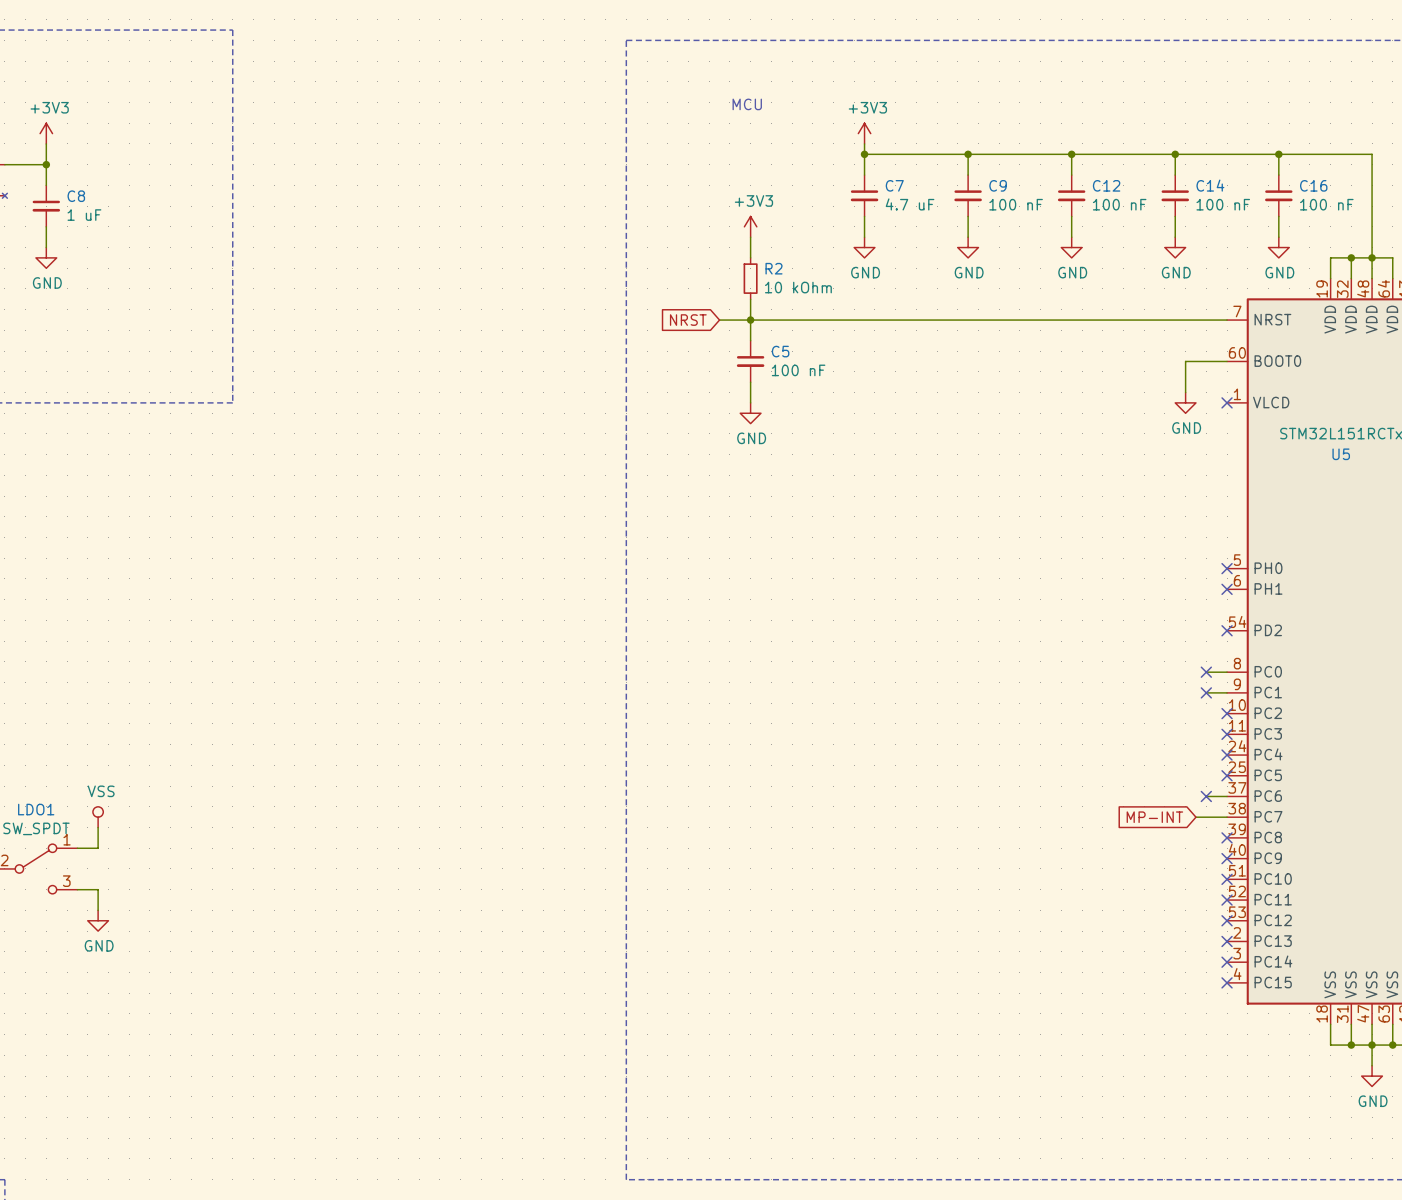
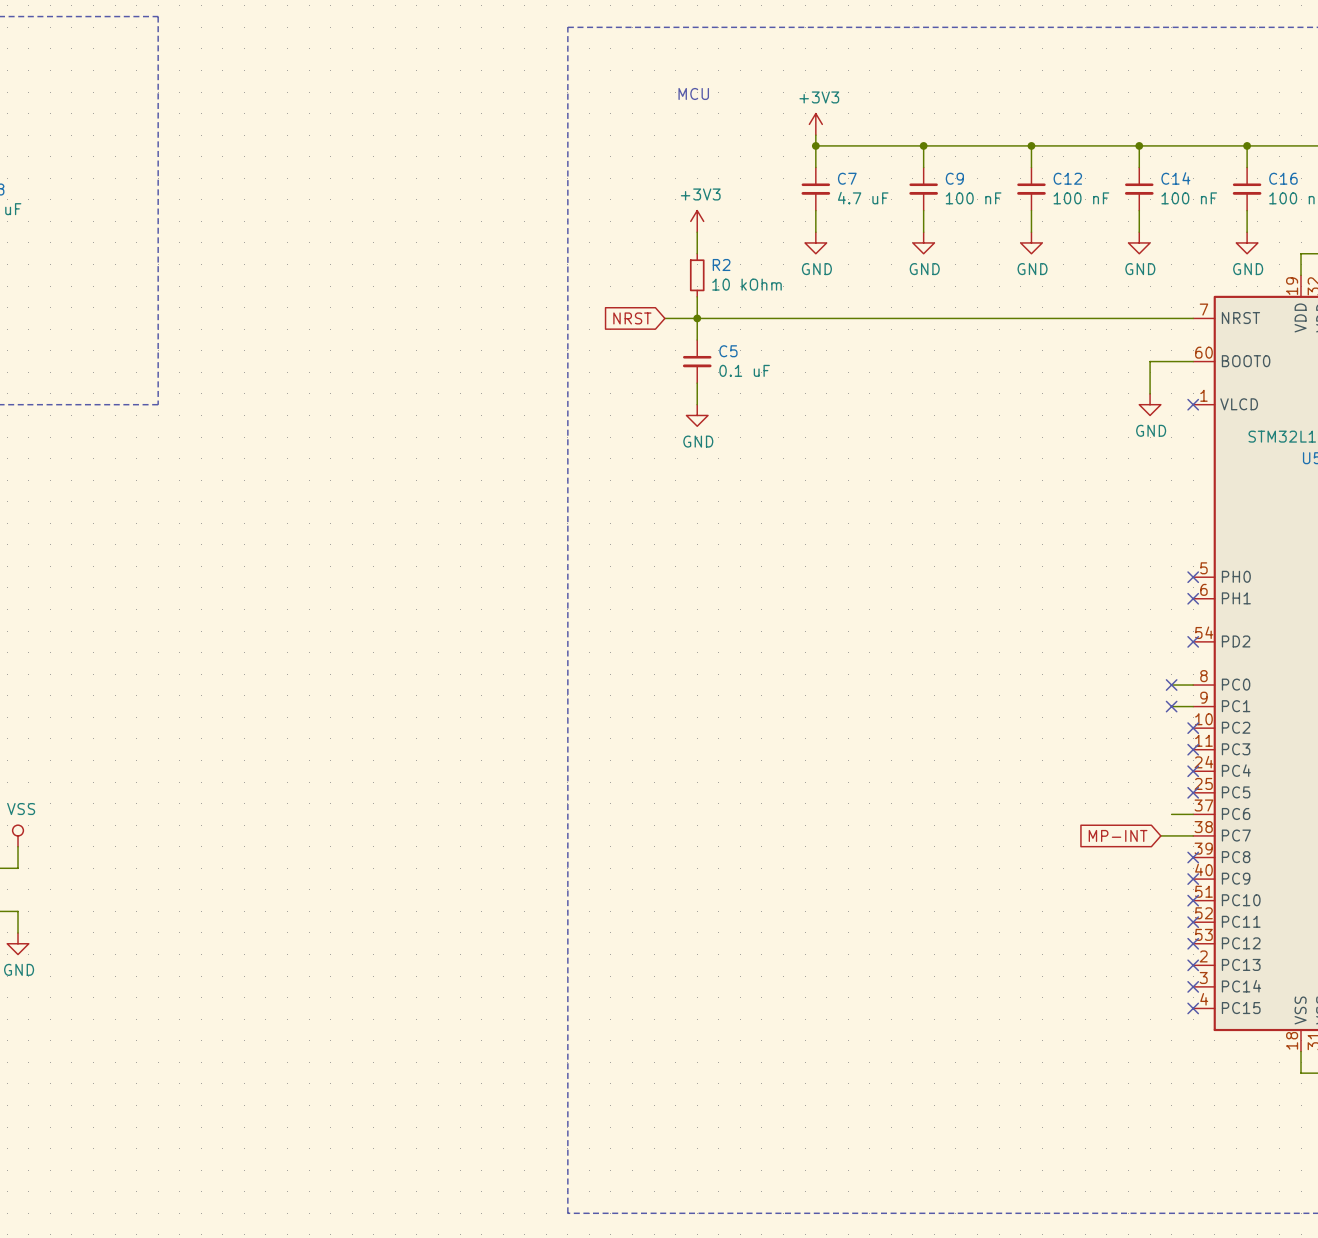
C5 value: 100 nF (798, 370) -> 0.1 uF (744, 370)
no-connect mark: (1206, 796) -> none

